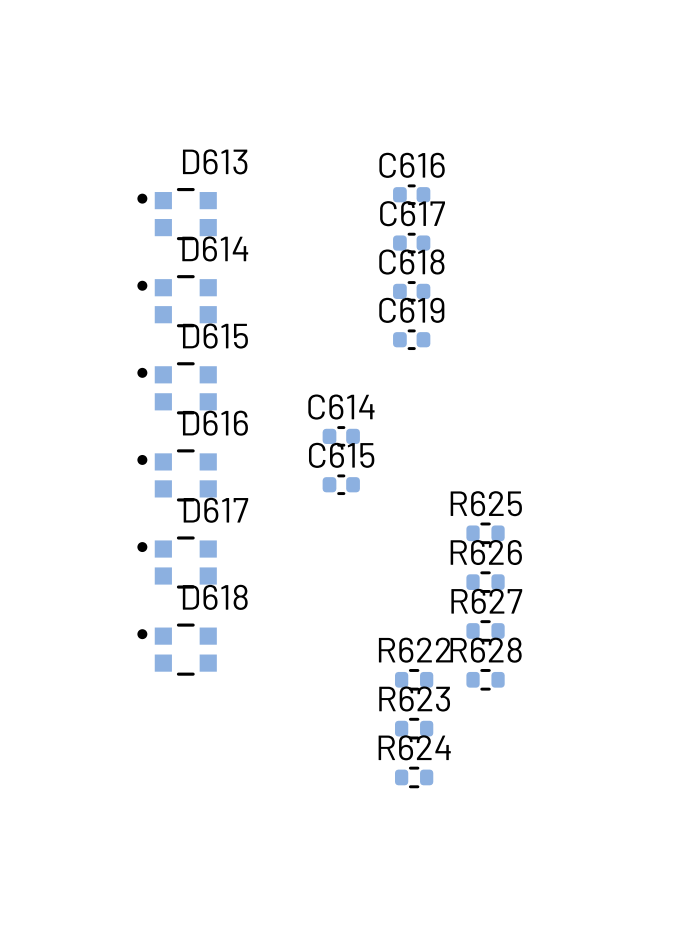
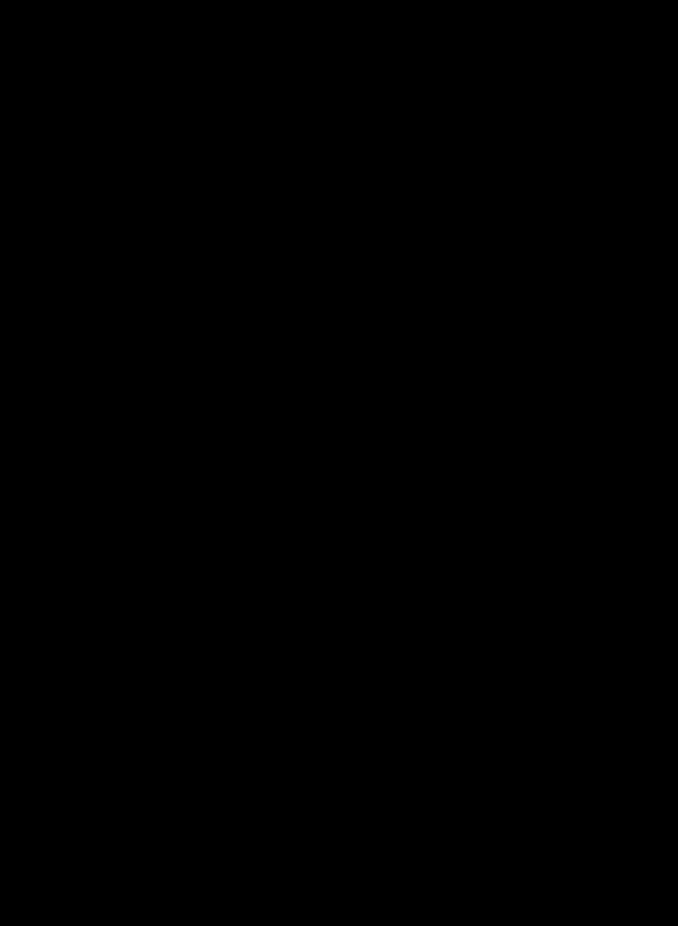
C616: (411, 194) -> none
D613: (177, 214) -> none
C617: (411, 243) -> none
C618: (411, 291) -> none
D614: (177, 301) -> none
C619: (411, 339) -> none
D615: (177, 388) -> none
C614: (341, 436) -> none
D616: (177, 475) -> none
C615: (341, 484) -> none
R625: (485, 533) -> none
D617: (177, 562) -> none
R626: (485, 582) -> none
R627: (485, 630) -> none
D618: (177, 649) -> none
R622: (414, 679) -> none
R628: (485, 679) -> none
R623: (414, 728) -> none
R624: (414, 777) -> none

